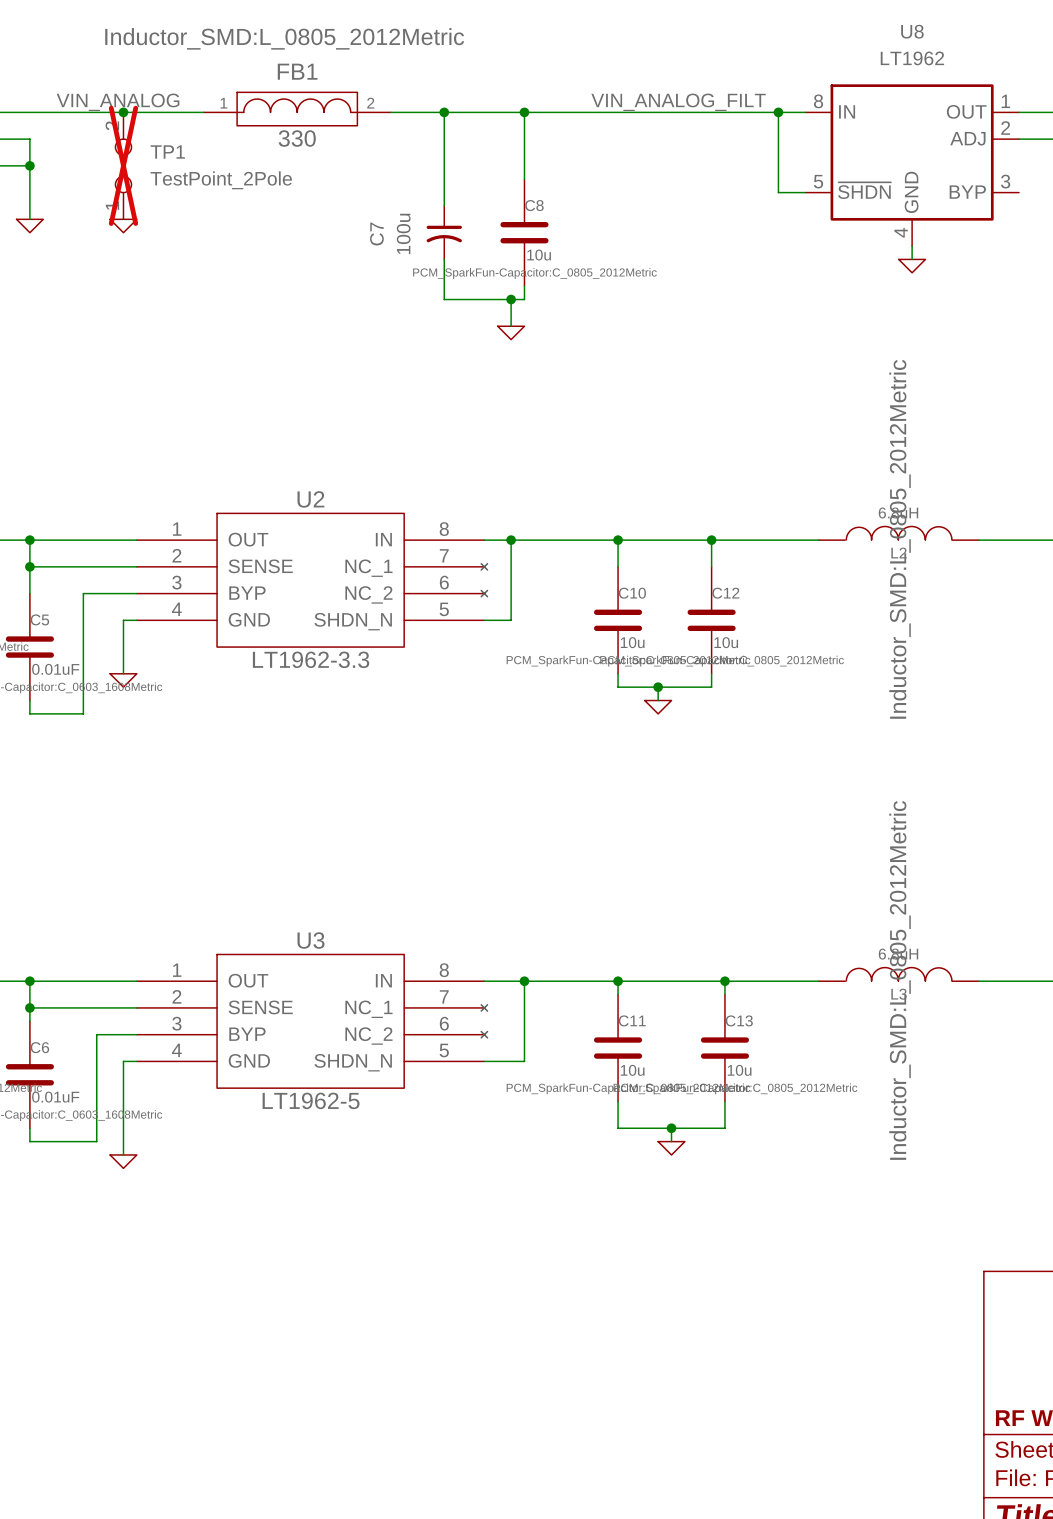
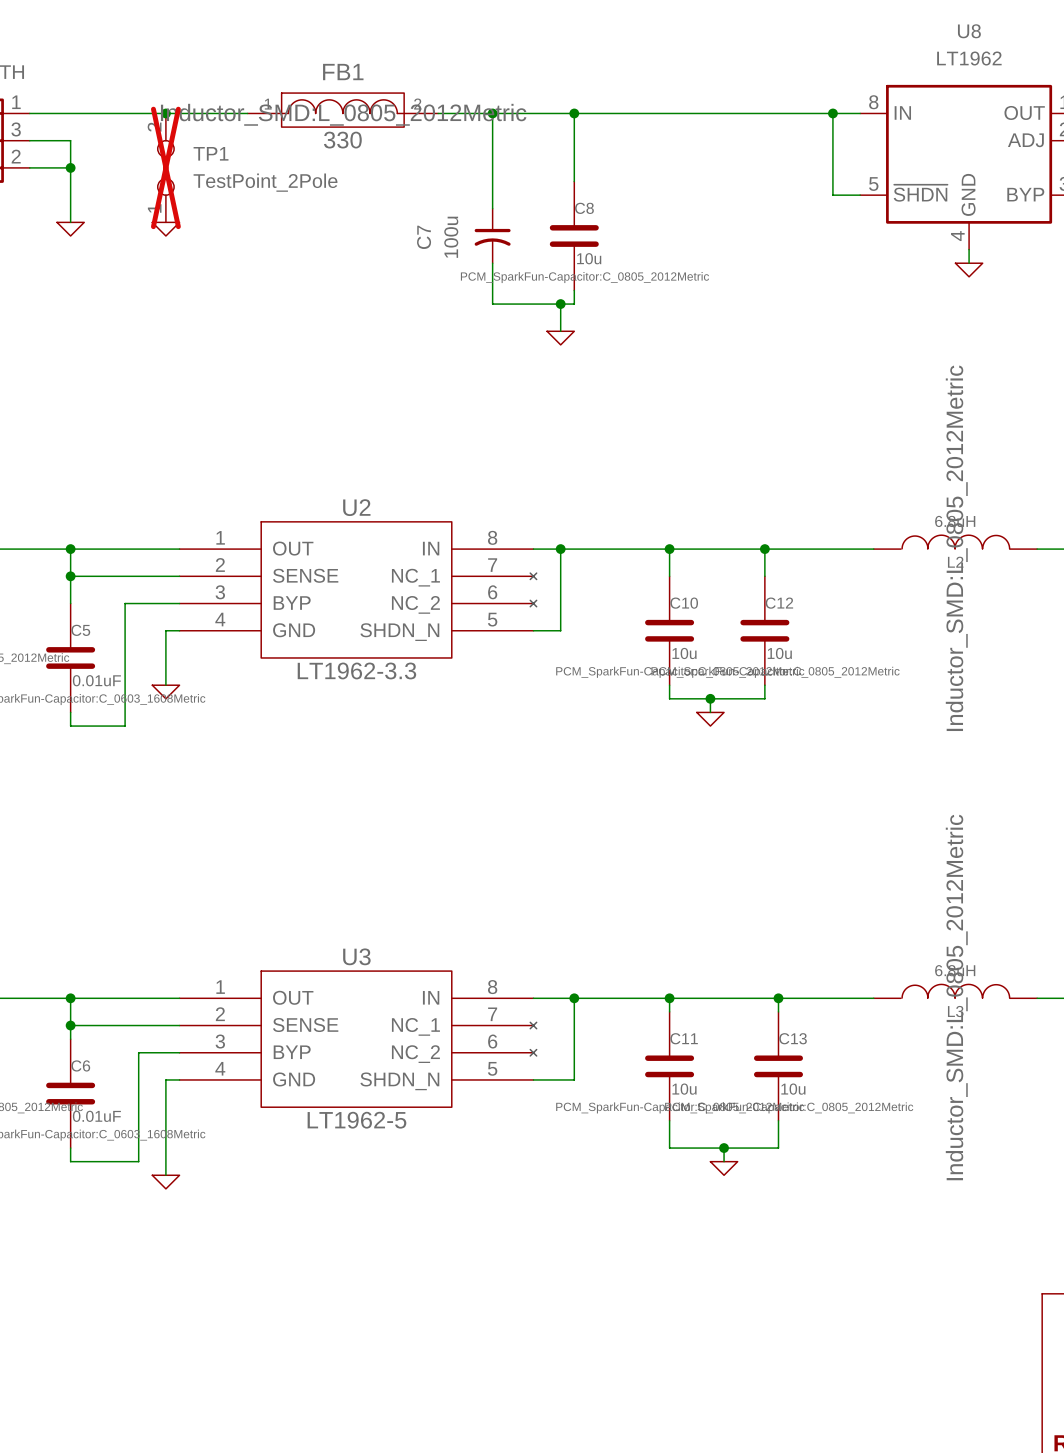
FB1 text position: Inductor_SMD:L_0805_2012Metric (284, 38) -> Inductor_SMD:L_0805_2012Metric (343, 114)
label: VIN_ANALOG (118, 102) -> none
label: VIN_ANALOG_FILT (678, 102) -> none

